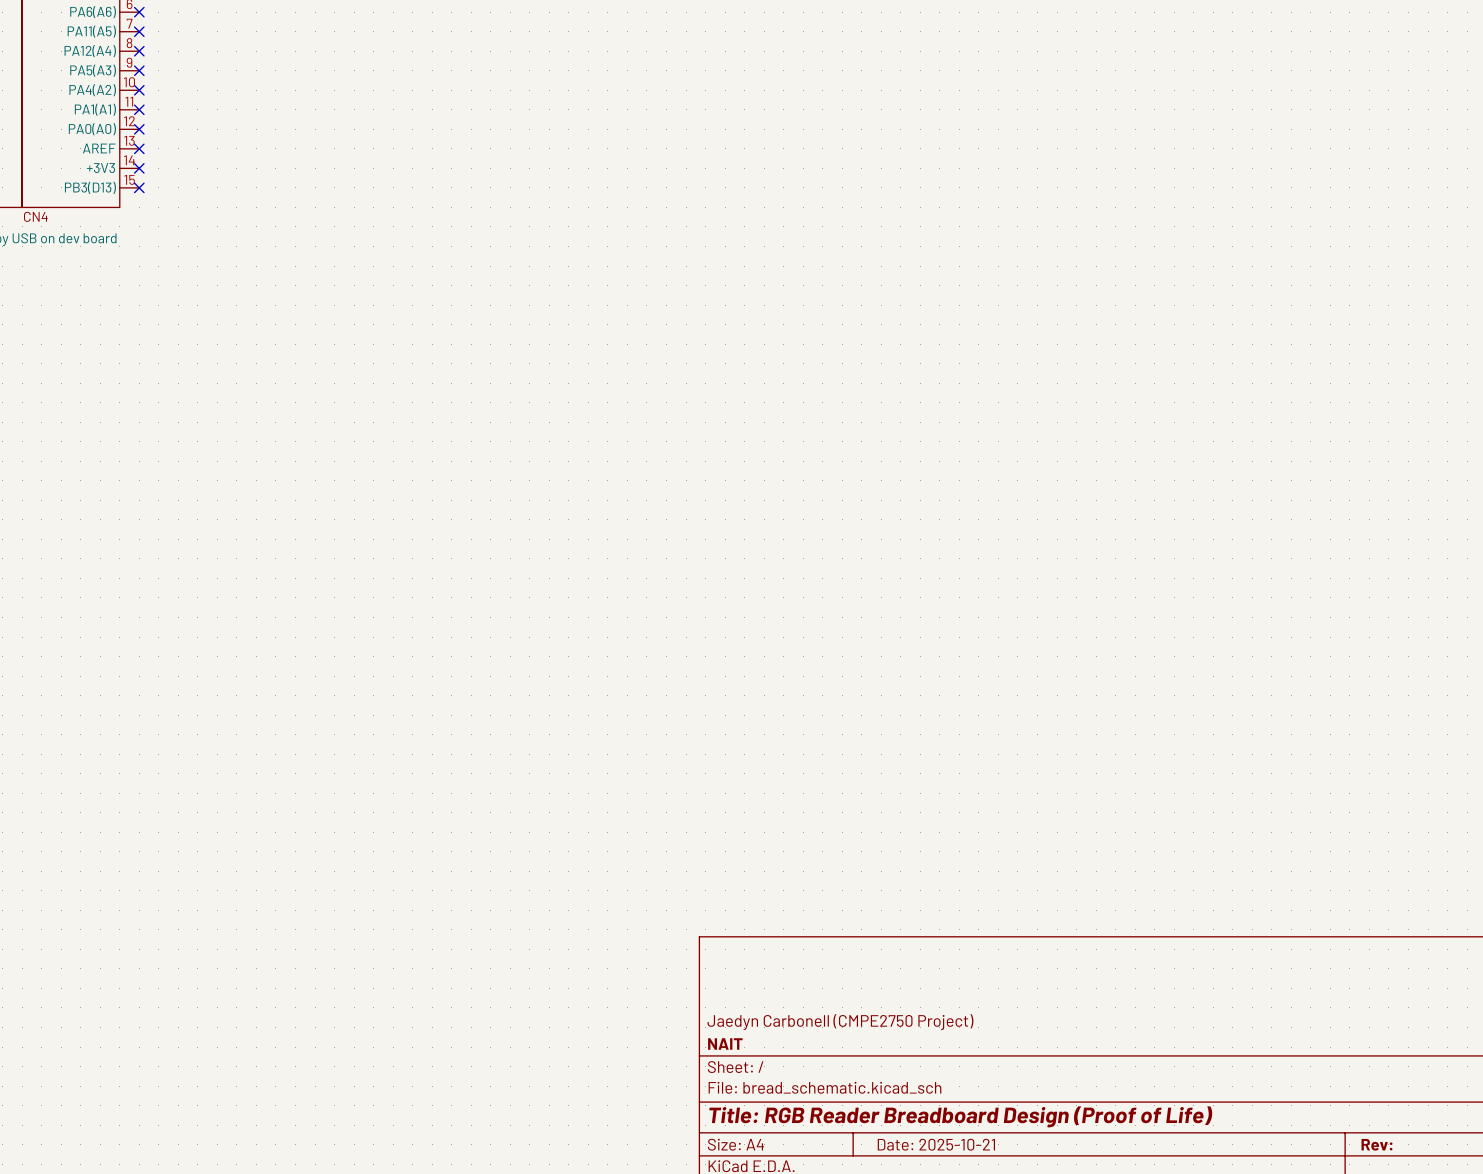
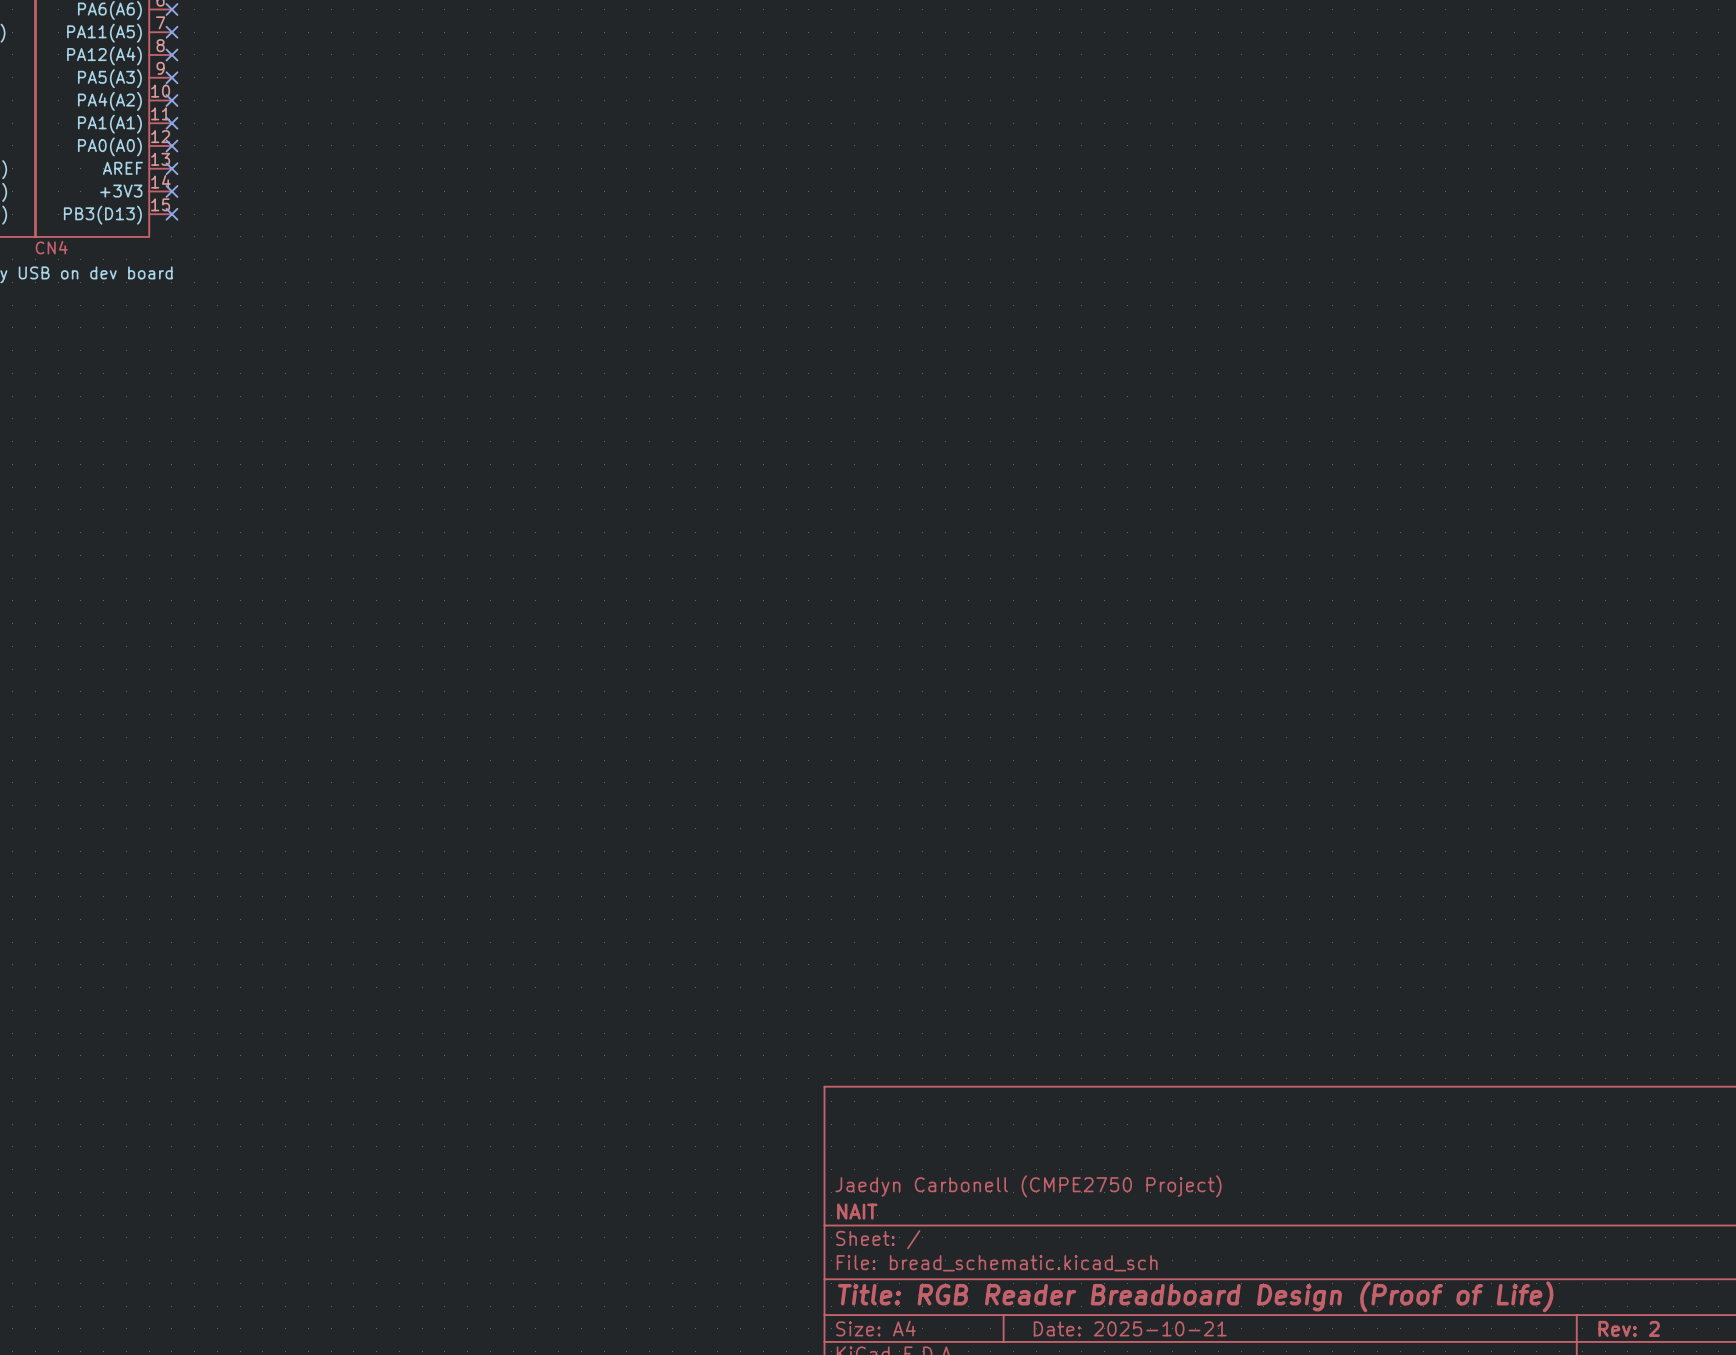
title block: Rev: (1376, 1144) -> Rev: 2 (1629, 1328)

